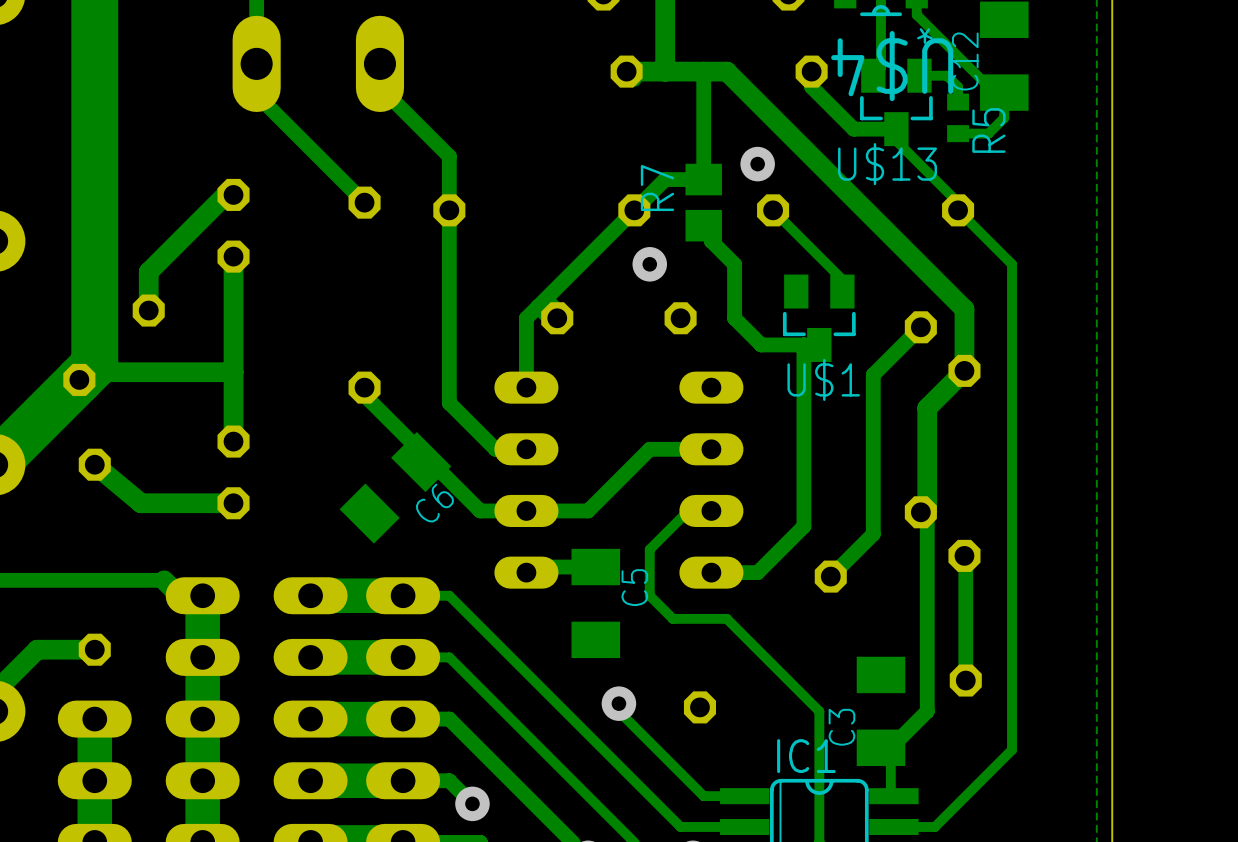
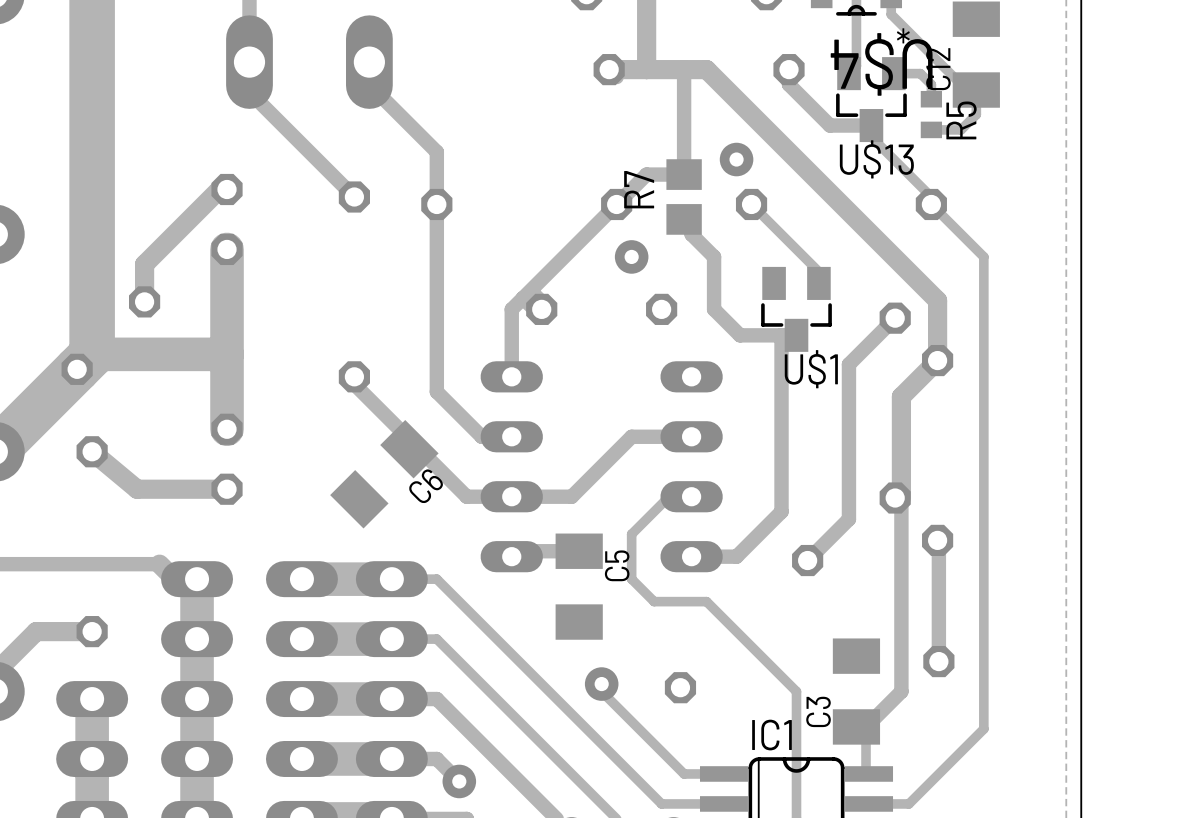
track width: thin (233, 256) (233, 441) -> thick (227, 249) (227, 429)
track: none -> (227, 354) (92, 354)
track: (233, 372) (79, 372) (79, 379) -> none

